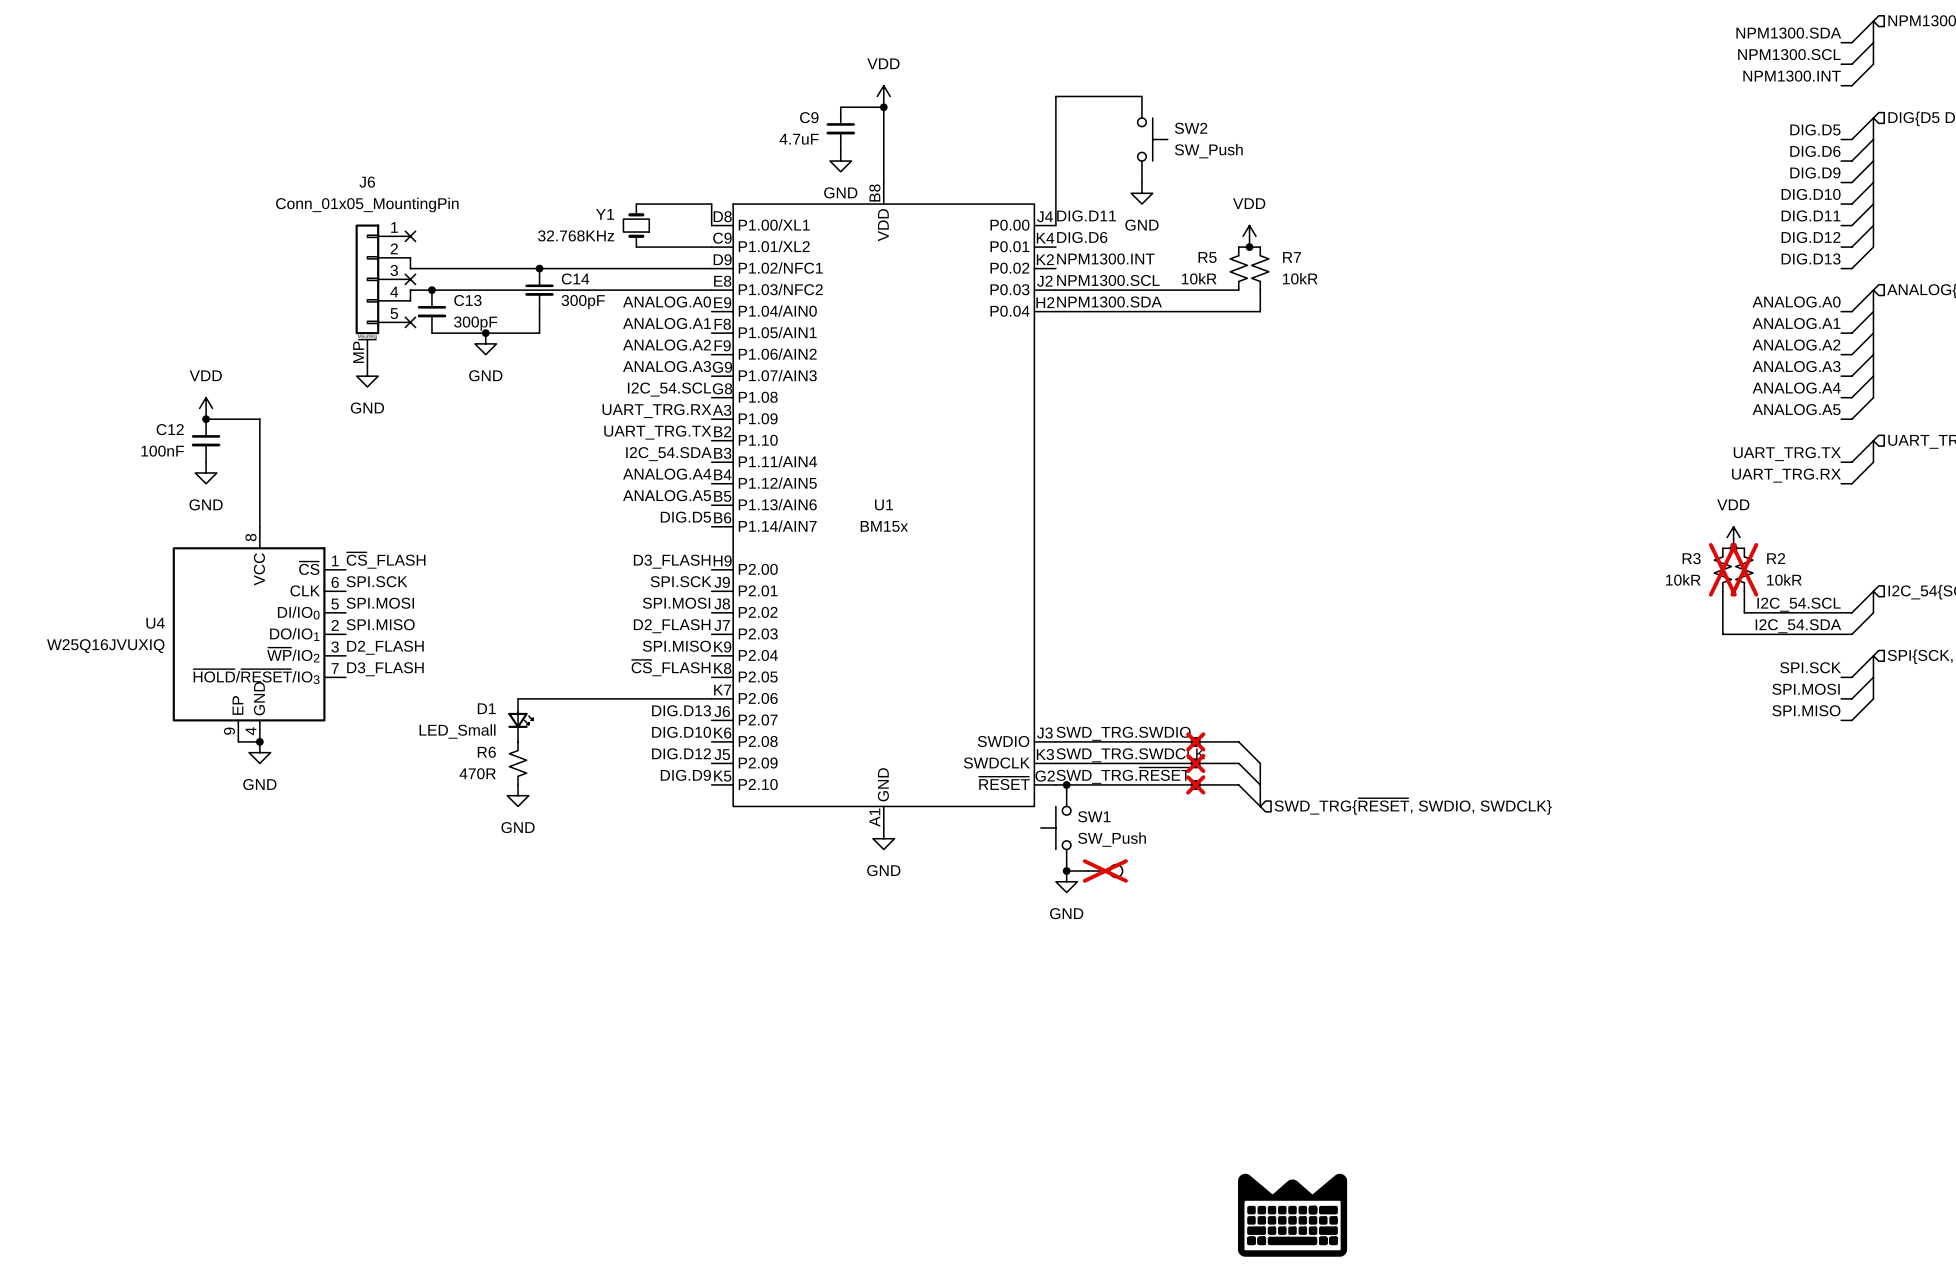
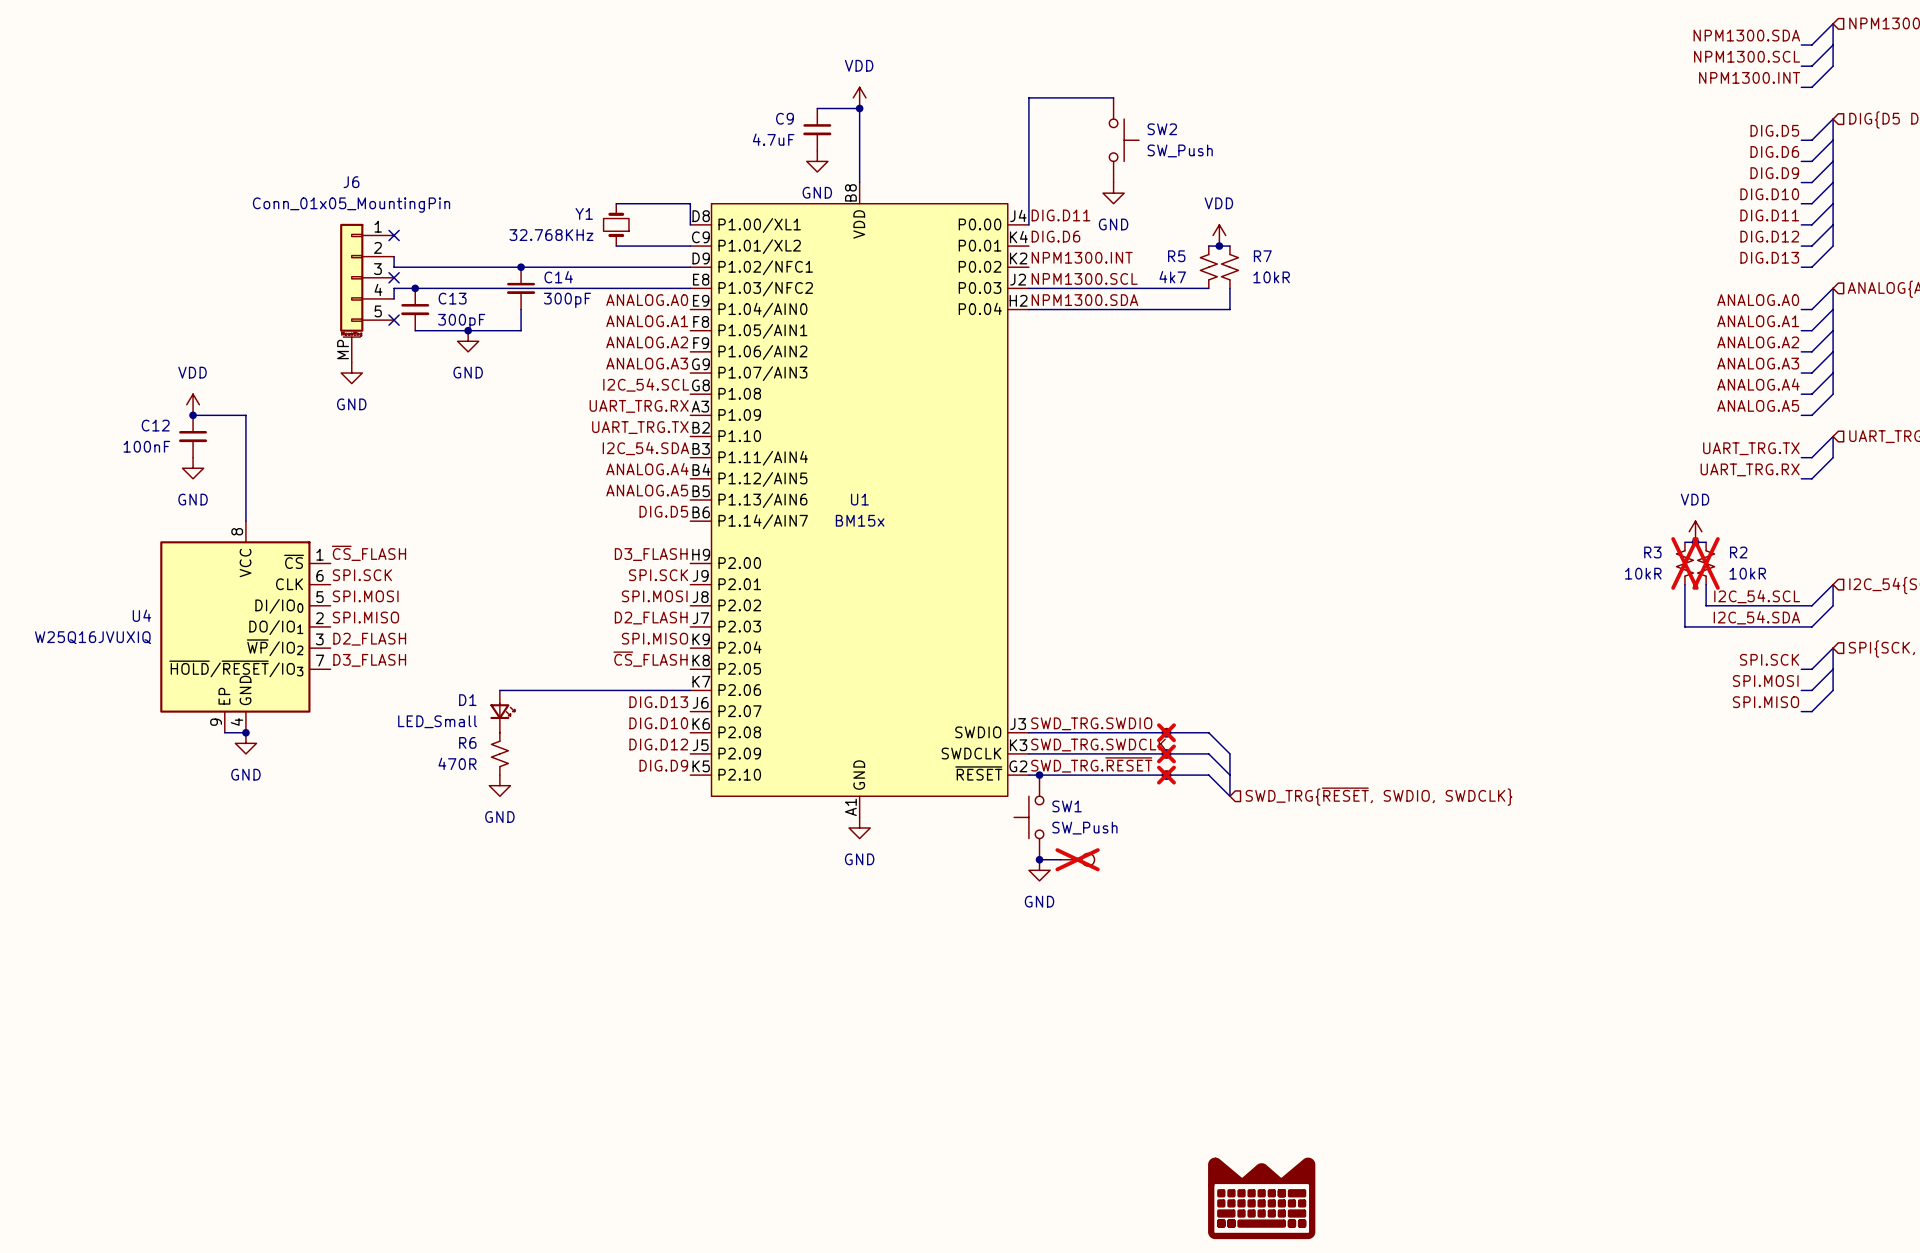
R5 value: 10kR (1199, 278) -> 4k7 (1172, 277)

